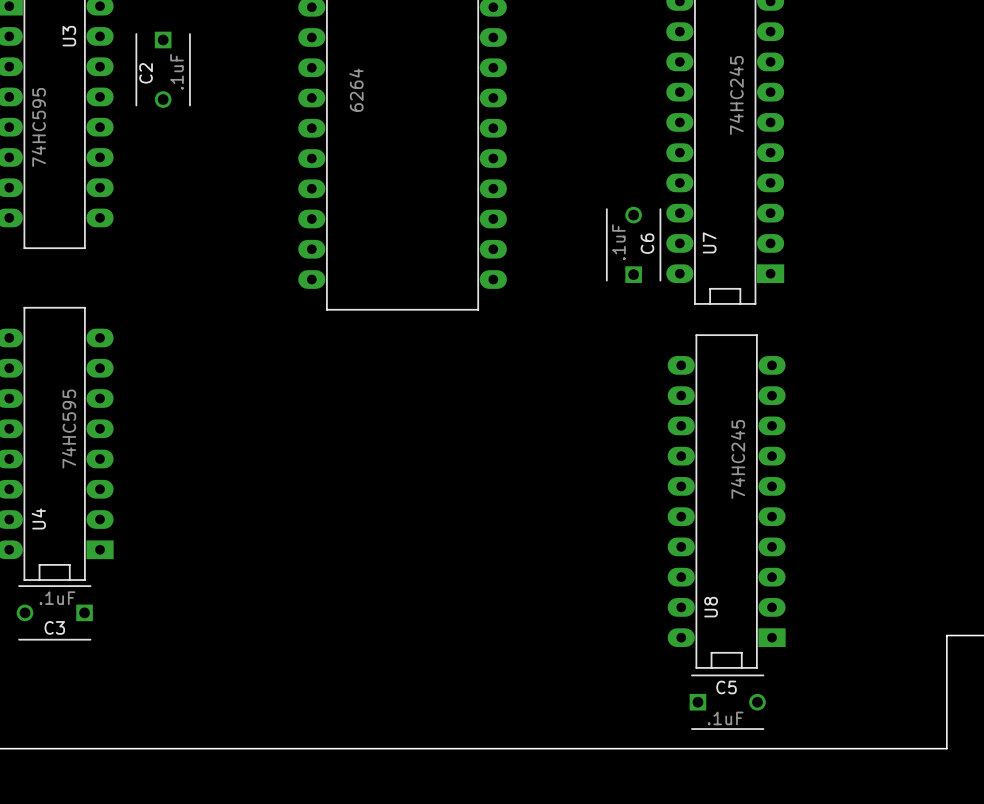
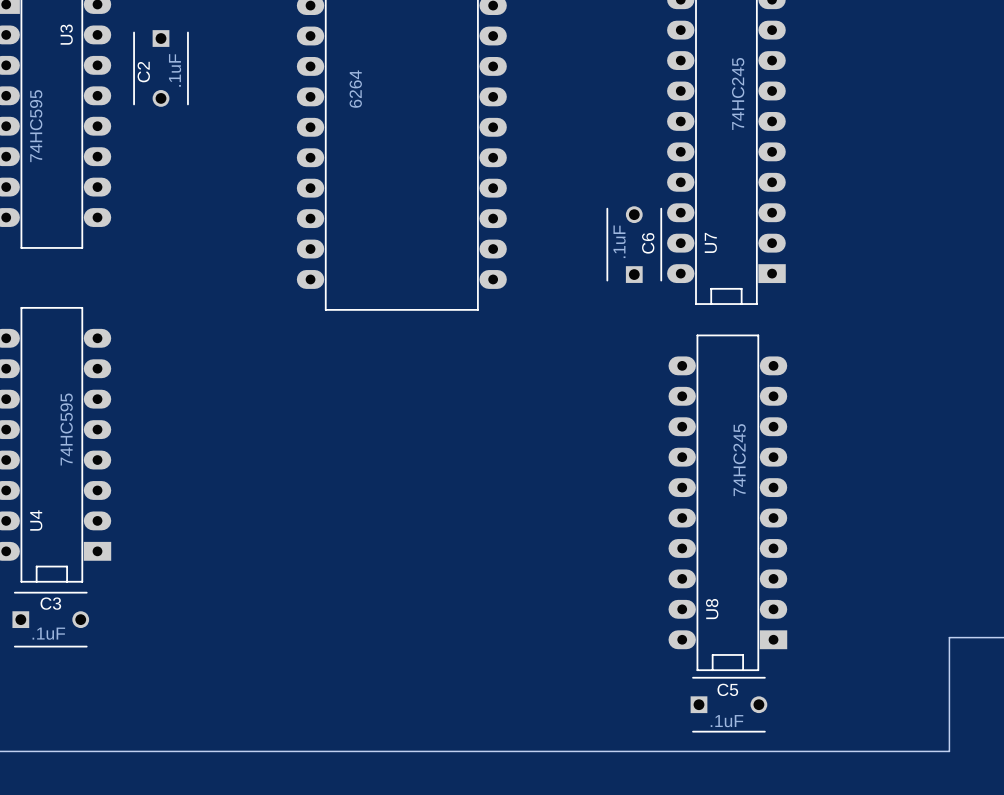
C3 rotation: 0° (54, 612) -> 180° (50, 619)

